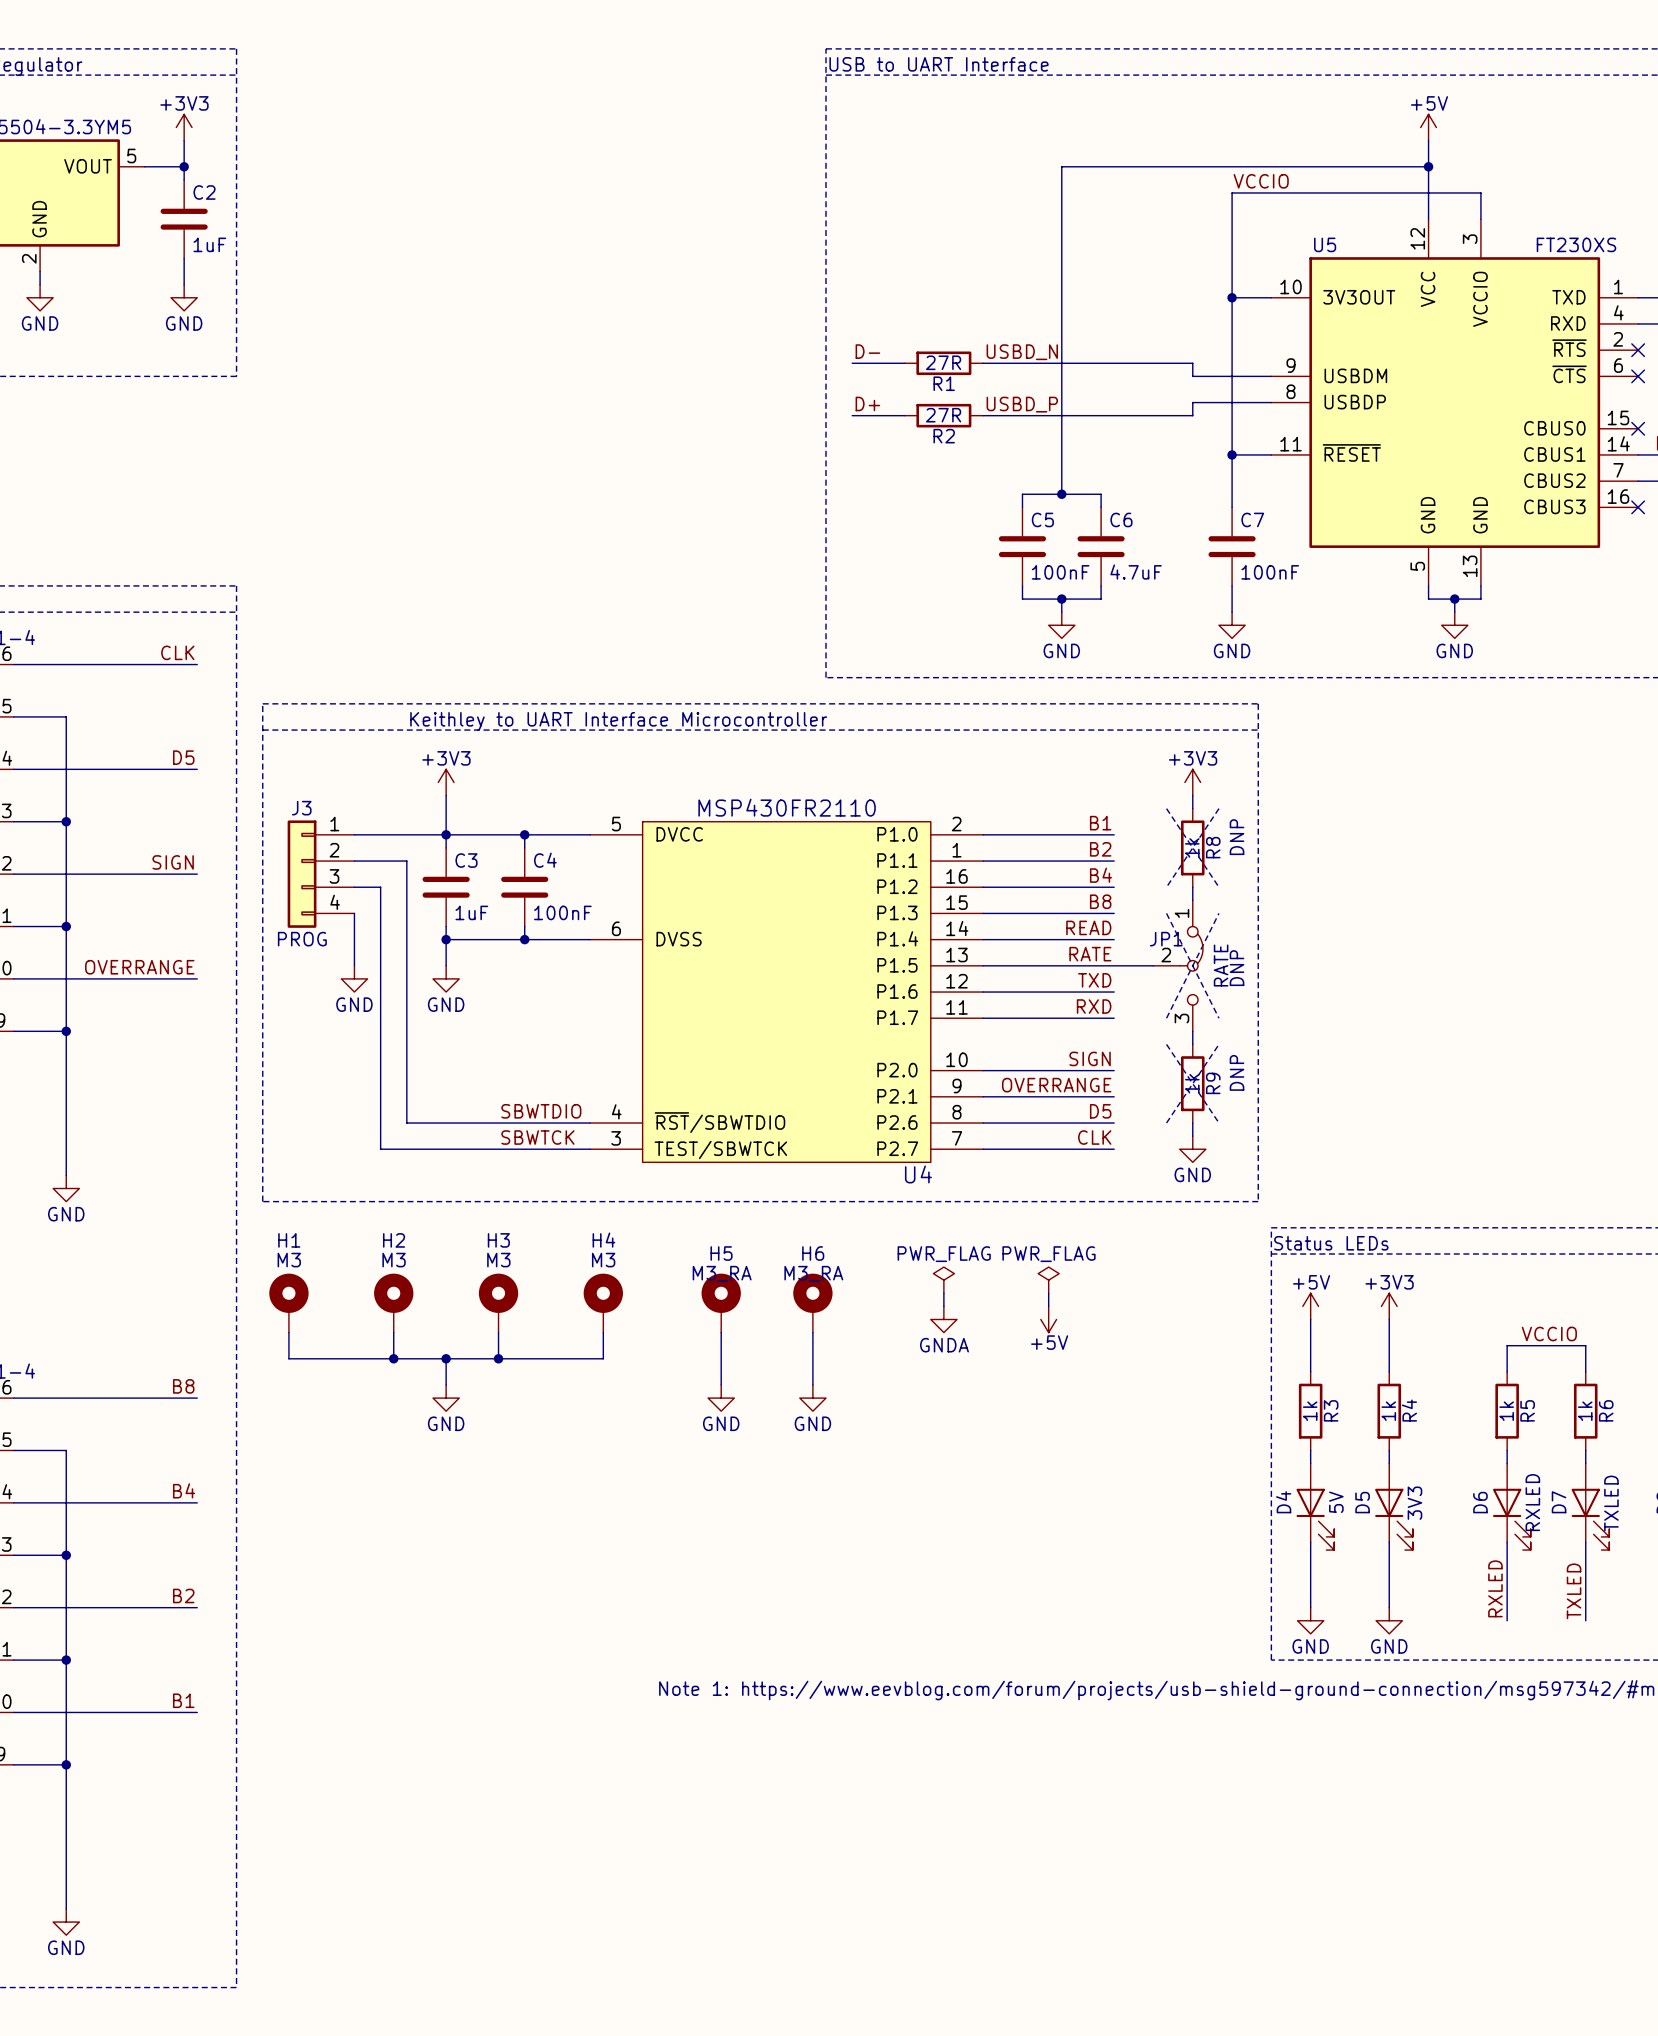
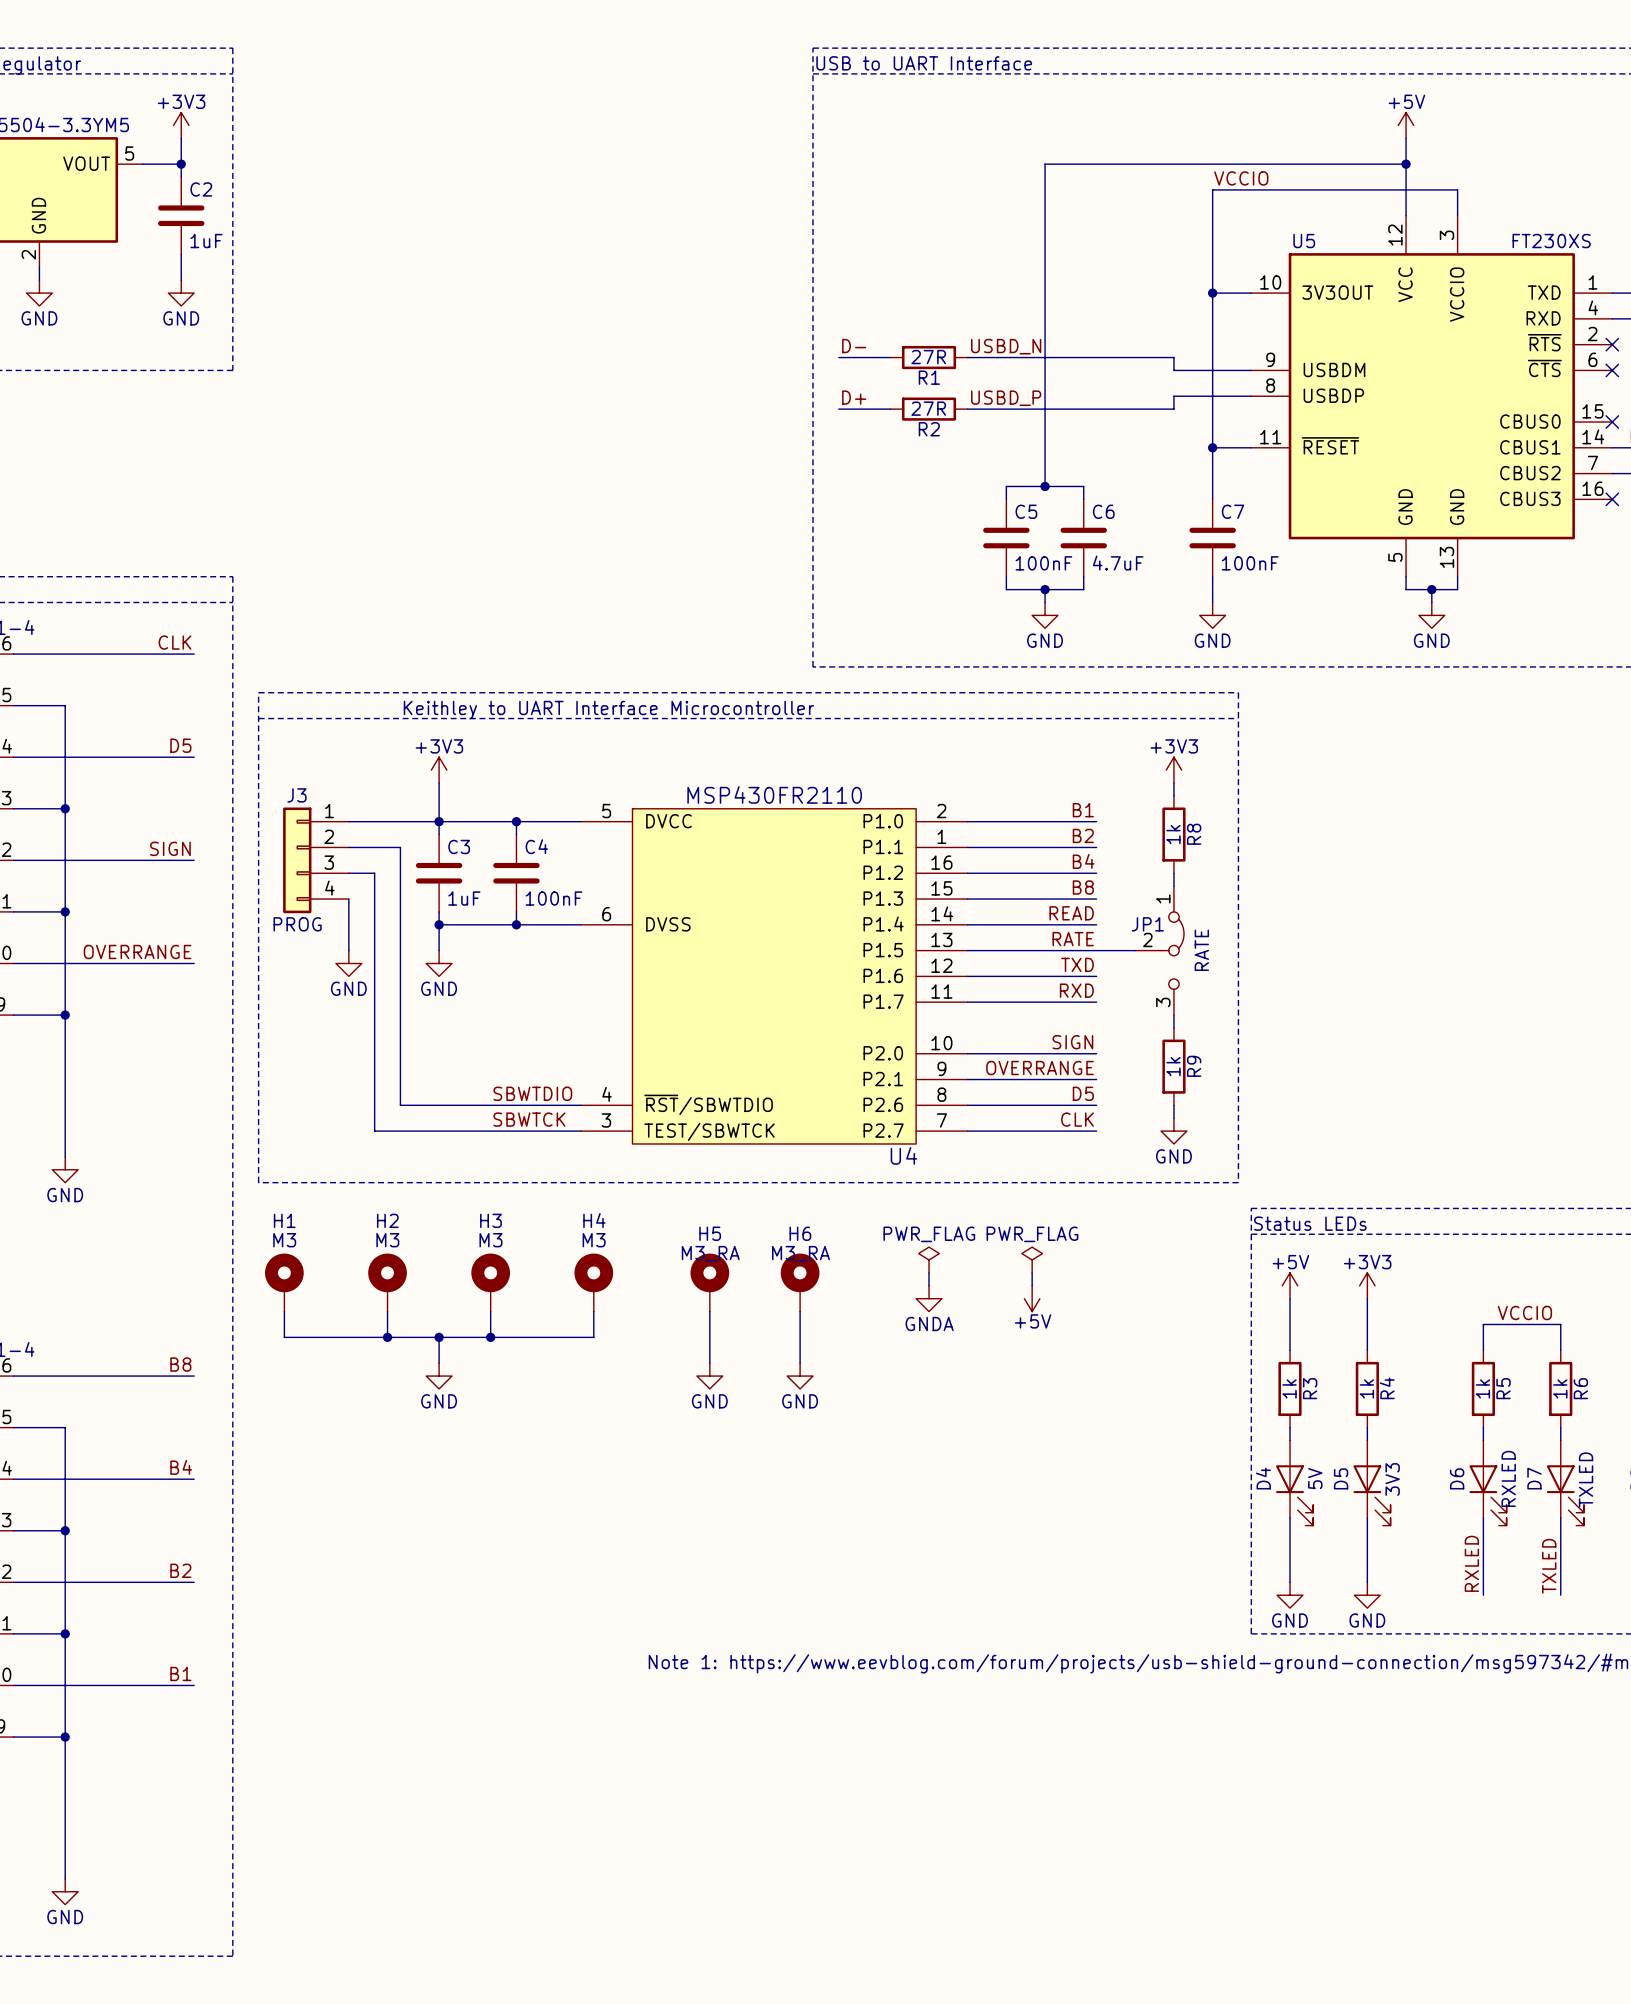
line: (1166, 808) (1218, 887) -> none
line: (1218, 808) (1166, 887) -> none
text: DNP (1237, 837) -> none
line: (1166, 913) (1218, 1018) -> none
line: (1218, 913) (1166, 1018) -> none
text: DNP (1237, 968) -> none
line: (1166, 1044) (1218, 1123) -> none
line: (1218, 1044) (1166, 1123) -> none
text: DNP (1237, 1072) -> none

